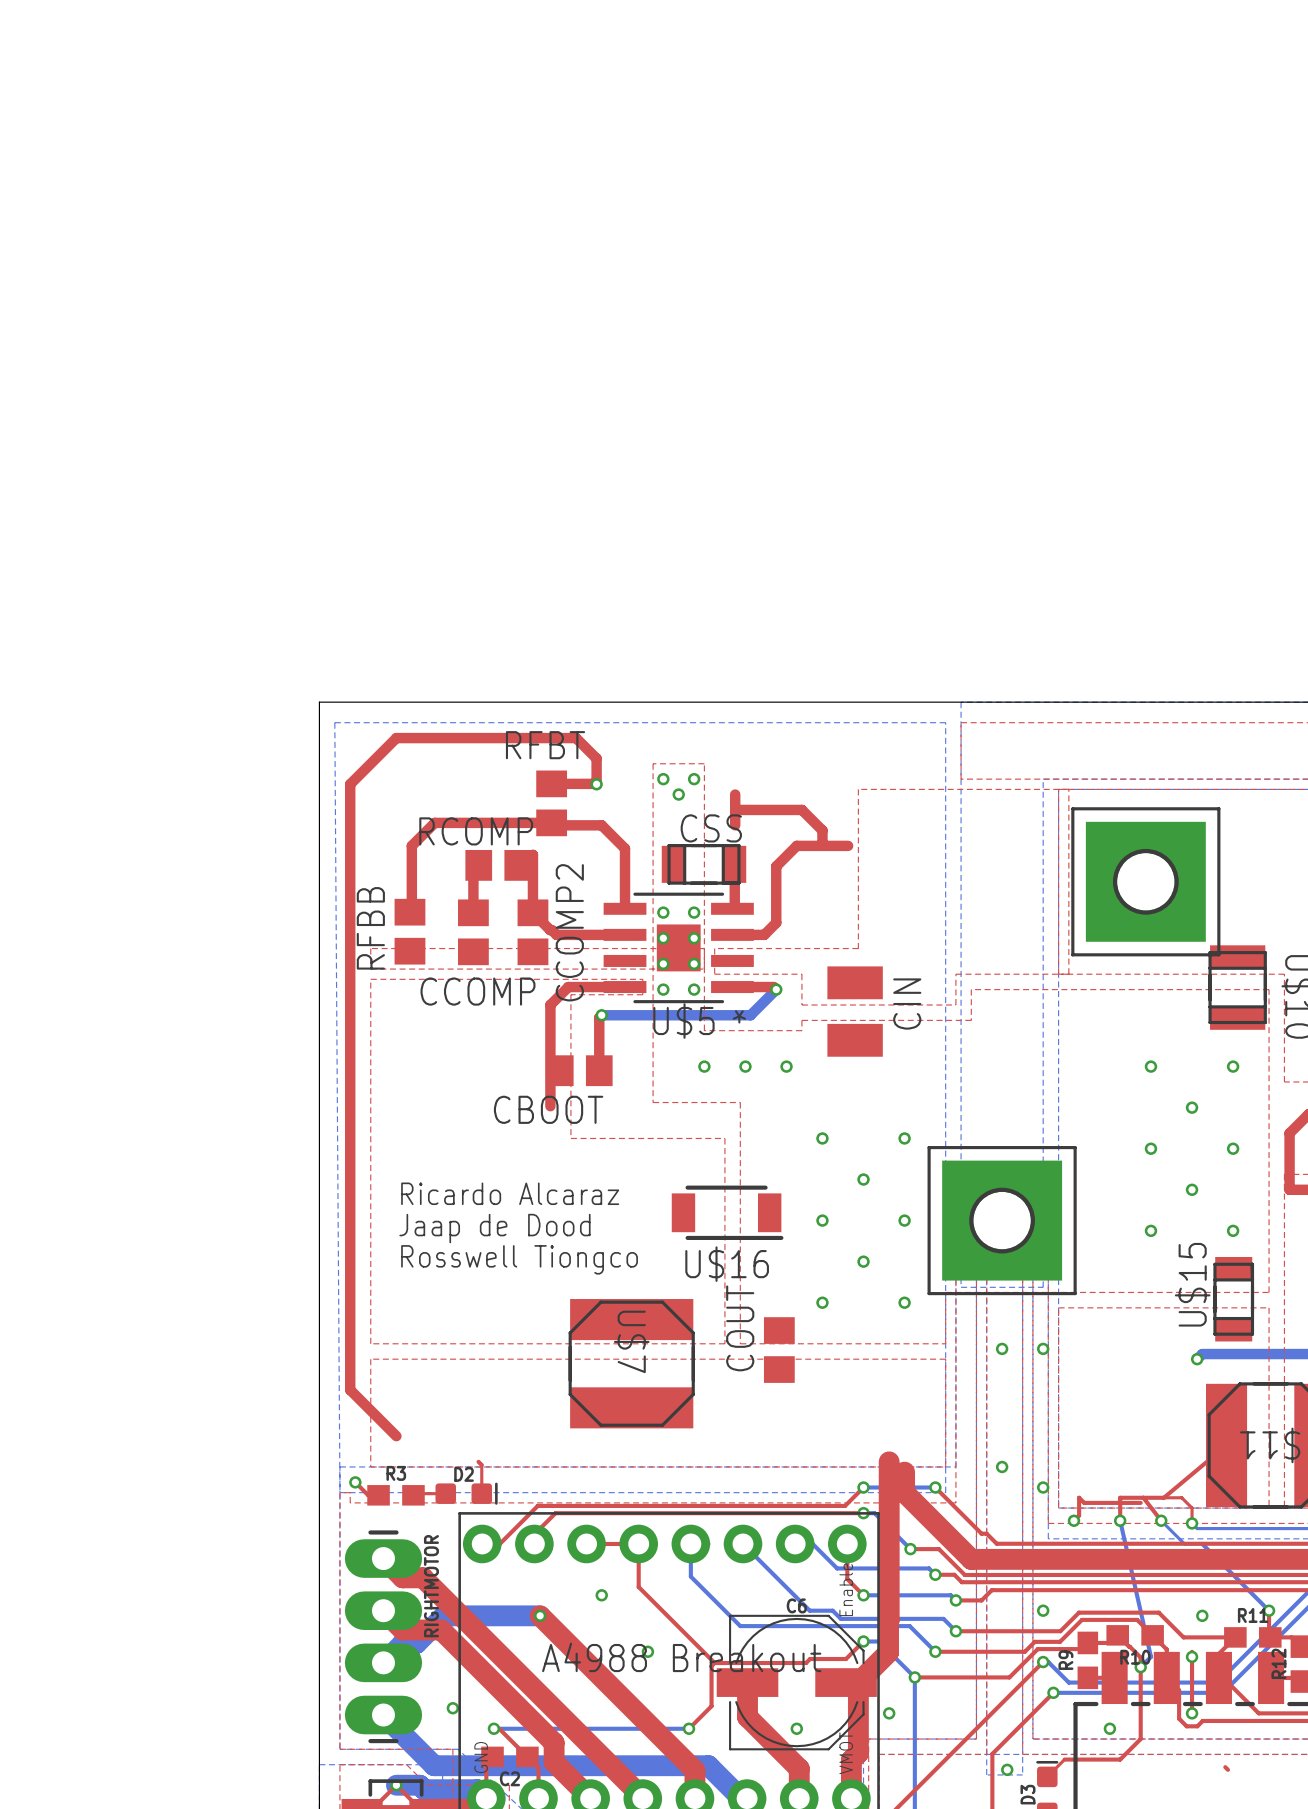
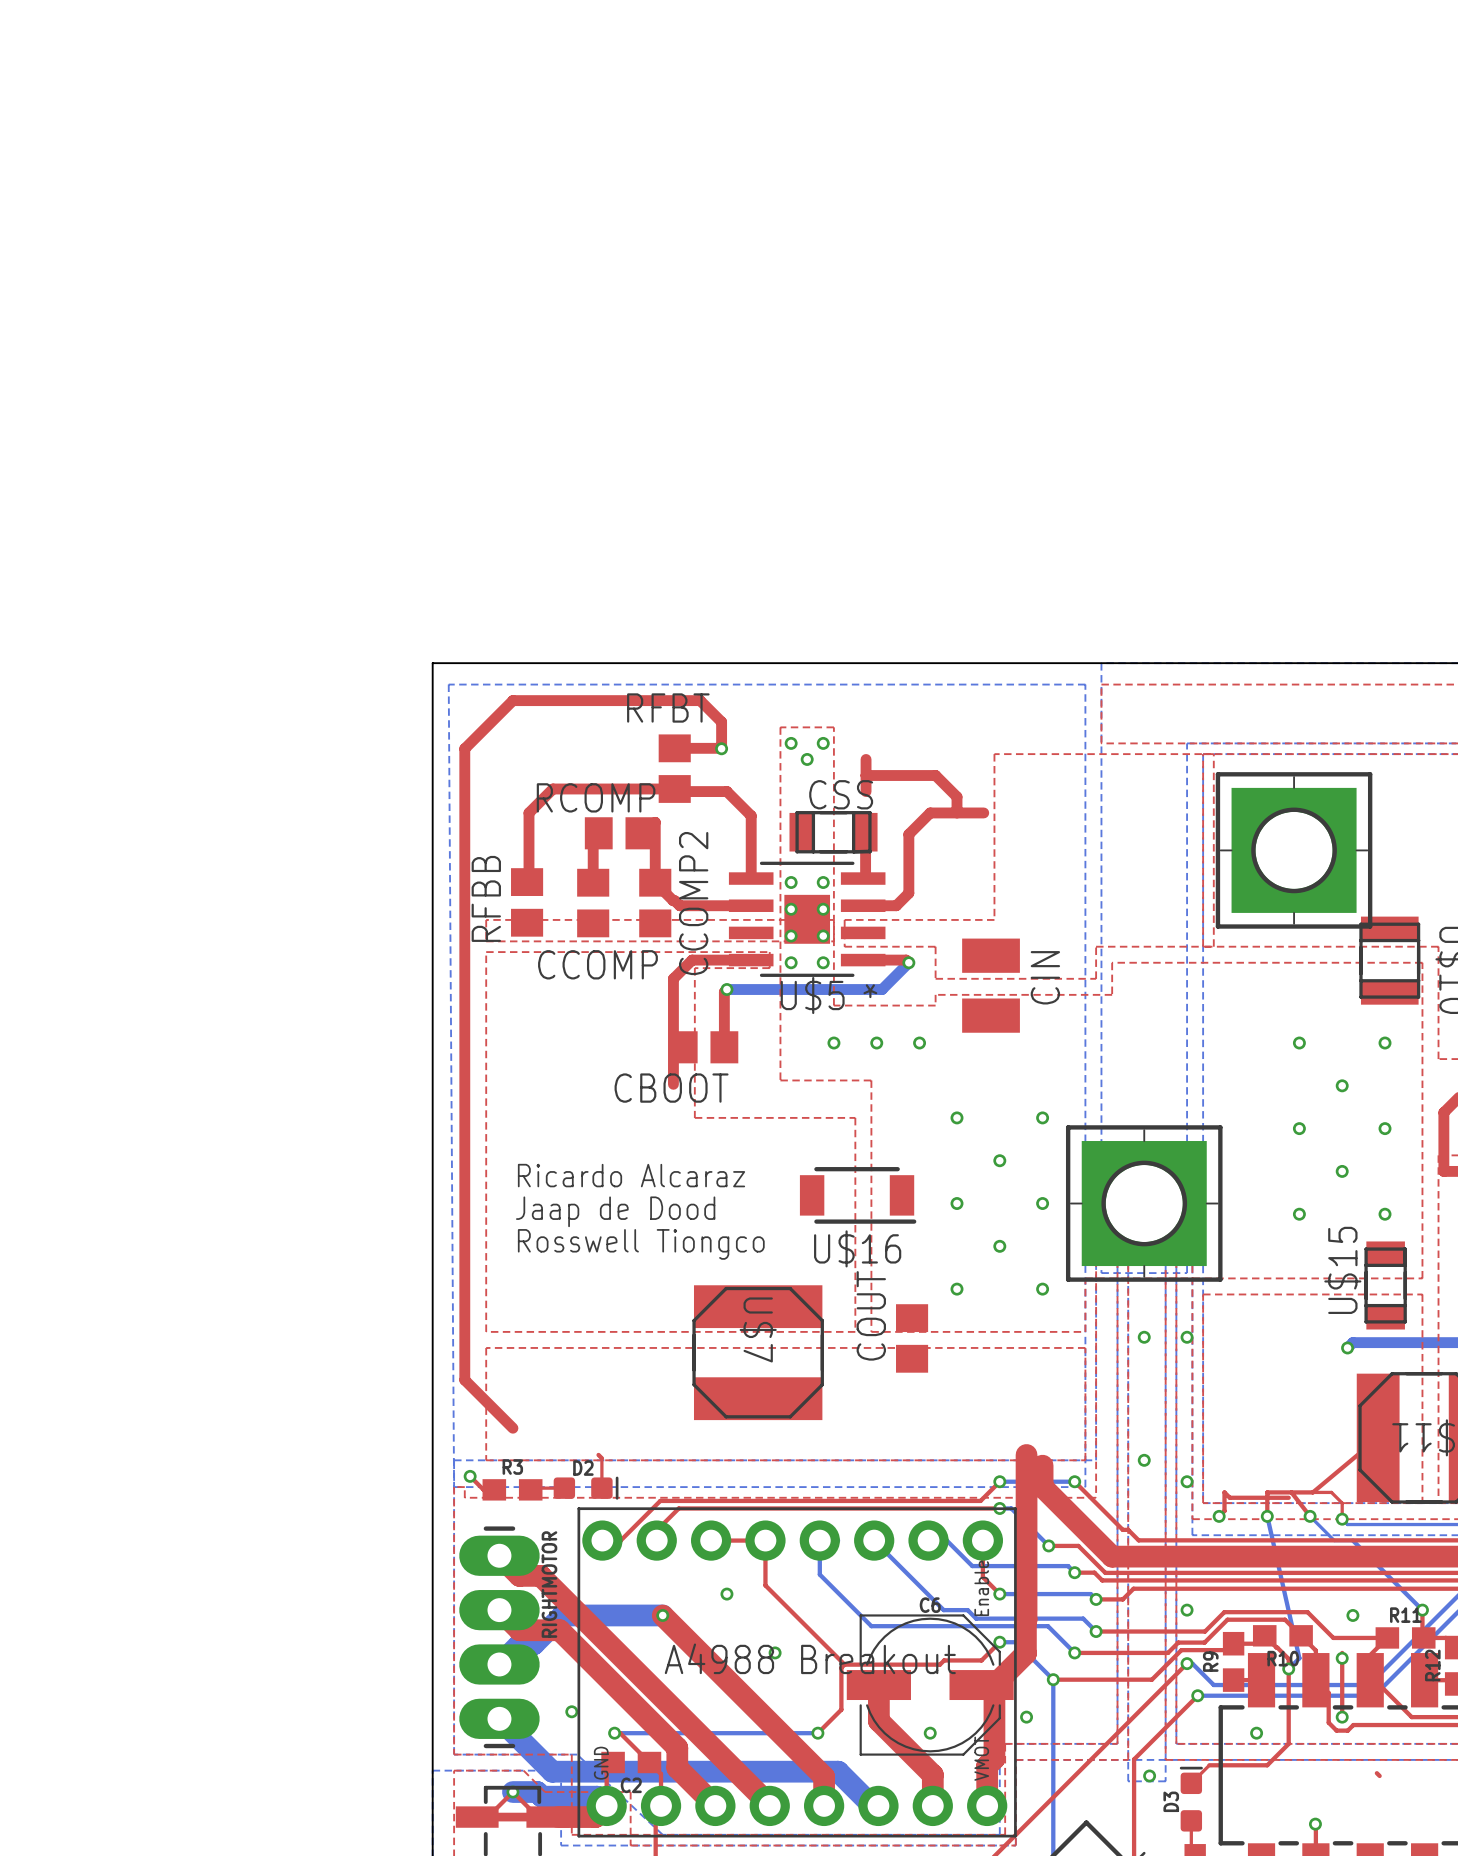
part footprint: [1071, 807, 1221, 957] -> [1215, 772, 1373, 929]
part footprint: [927, 1146, 1077, 1296] -> [1065, 1125, 1223, 1282]

